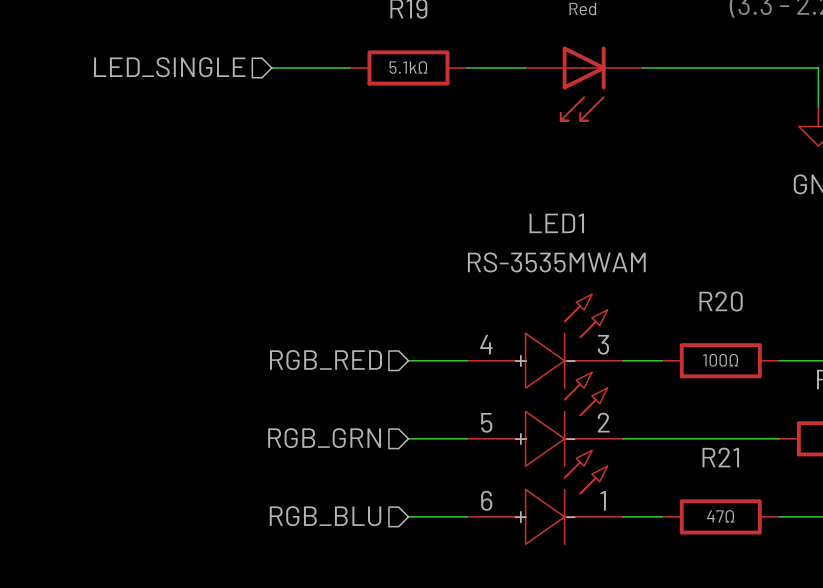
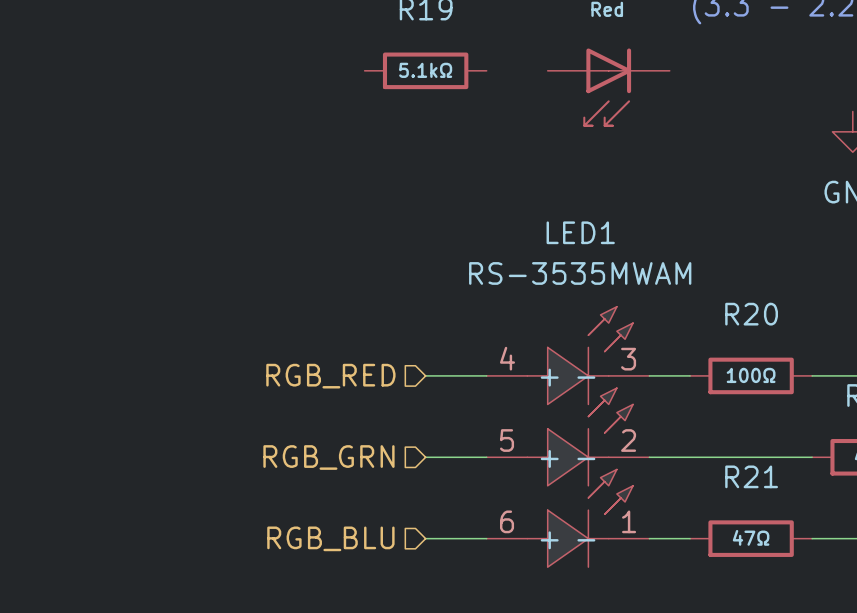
hierarchical label: LED_SINGLE (169, 67) -> none
wire: (271, 67) (349, 67) -> none
wire: (467, 67) (525, 67) -> none
wire: (642, 67) (818, 67) (818, 107) -> none

